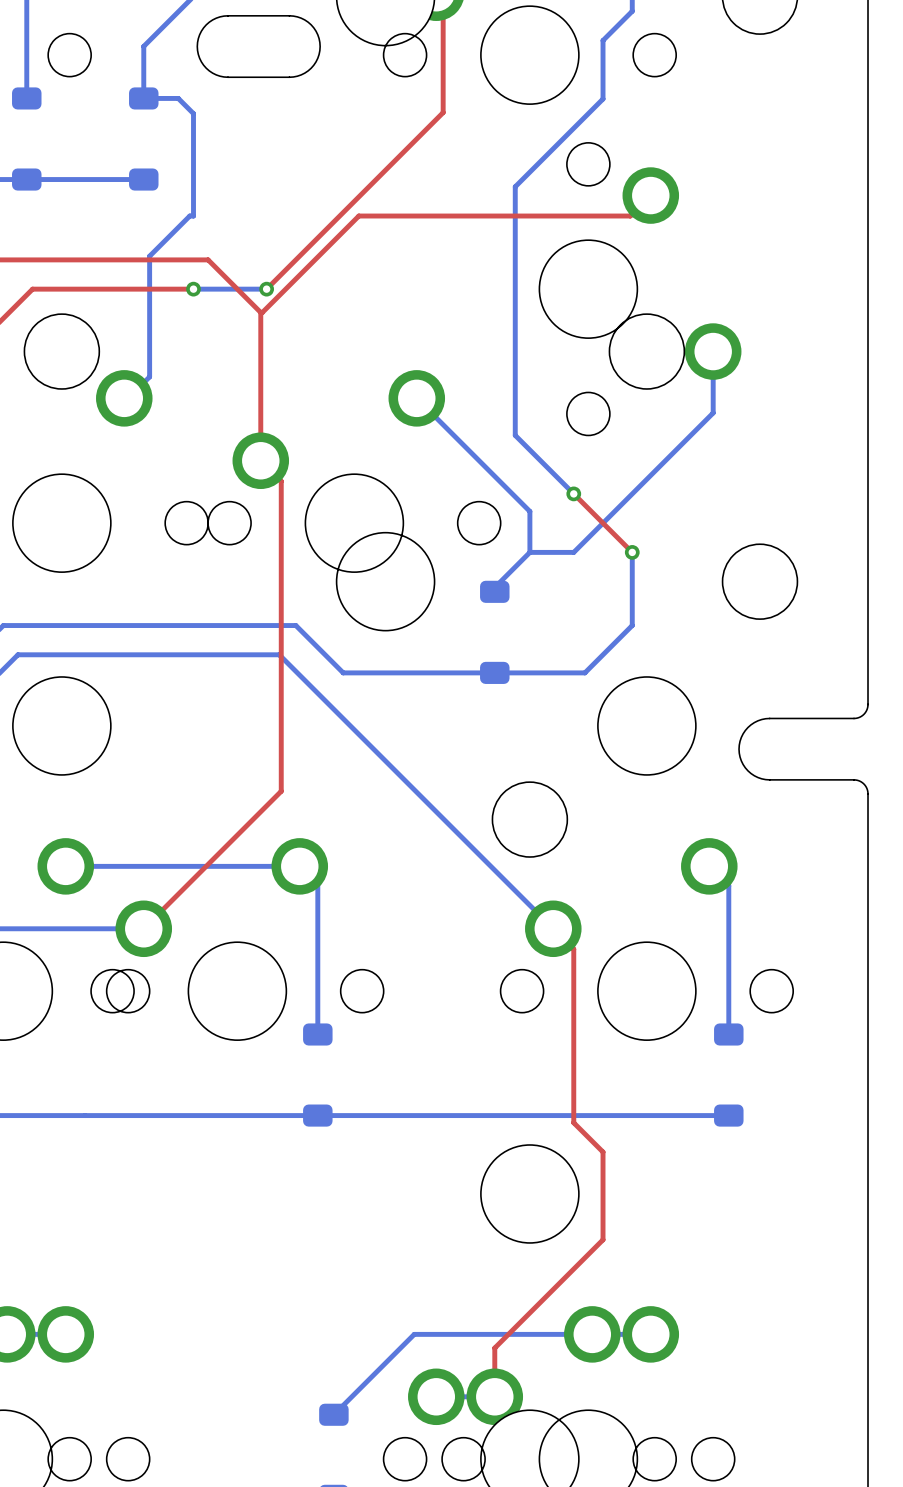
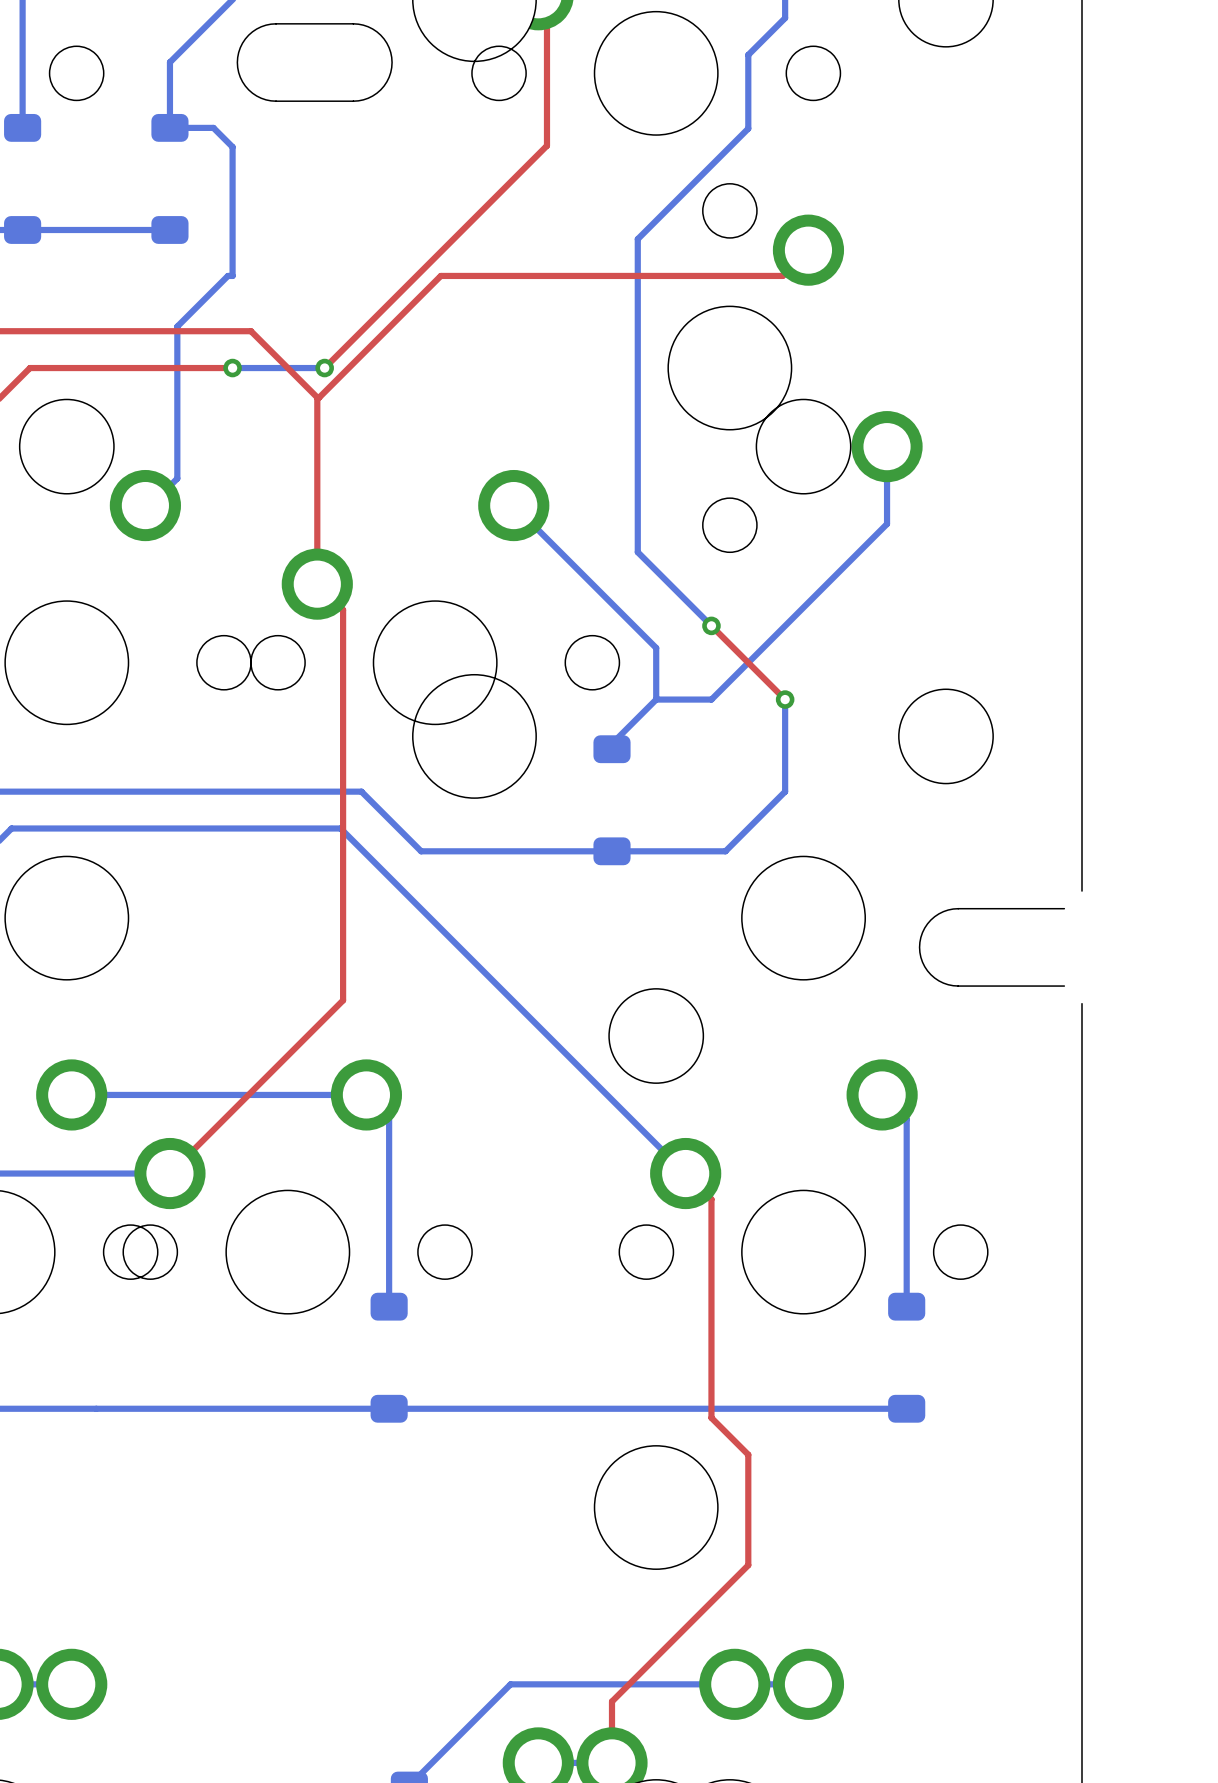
board edge: (868, 704) (863, 714) (854, 718) -> none
board edge: (854, 779) (863, 783) (868, 793) -> none

